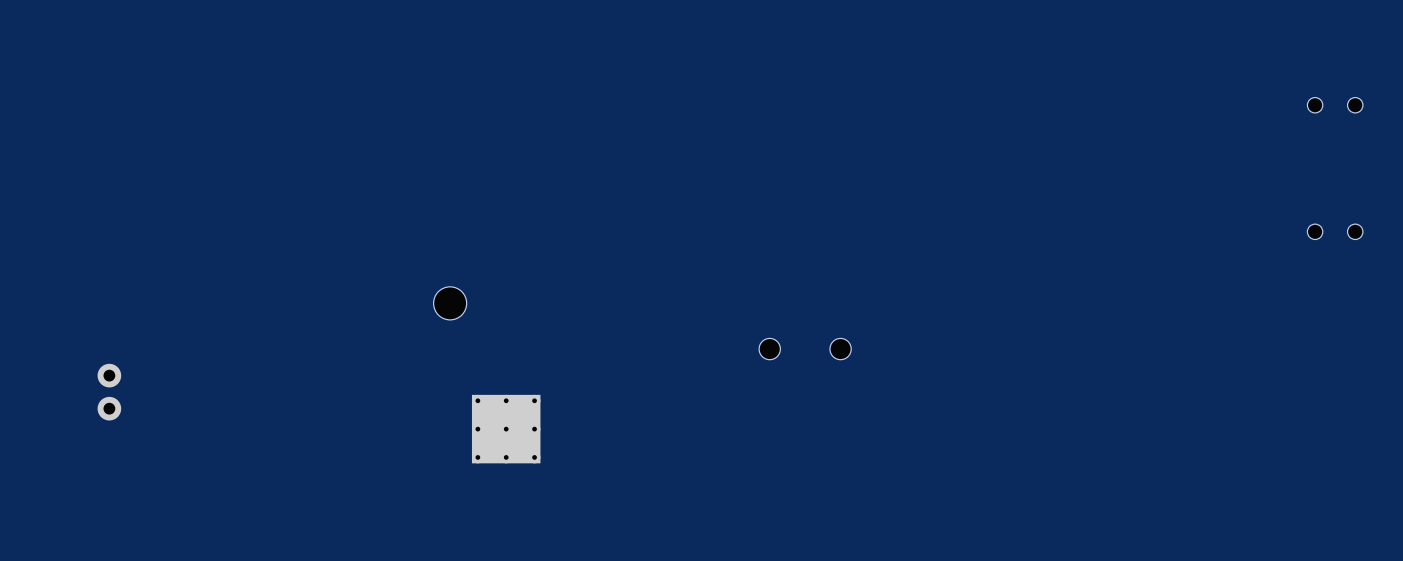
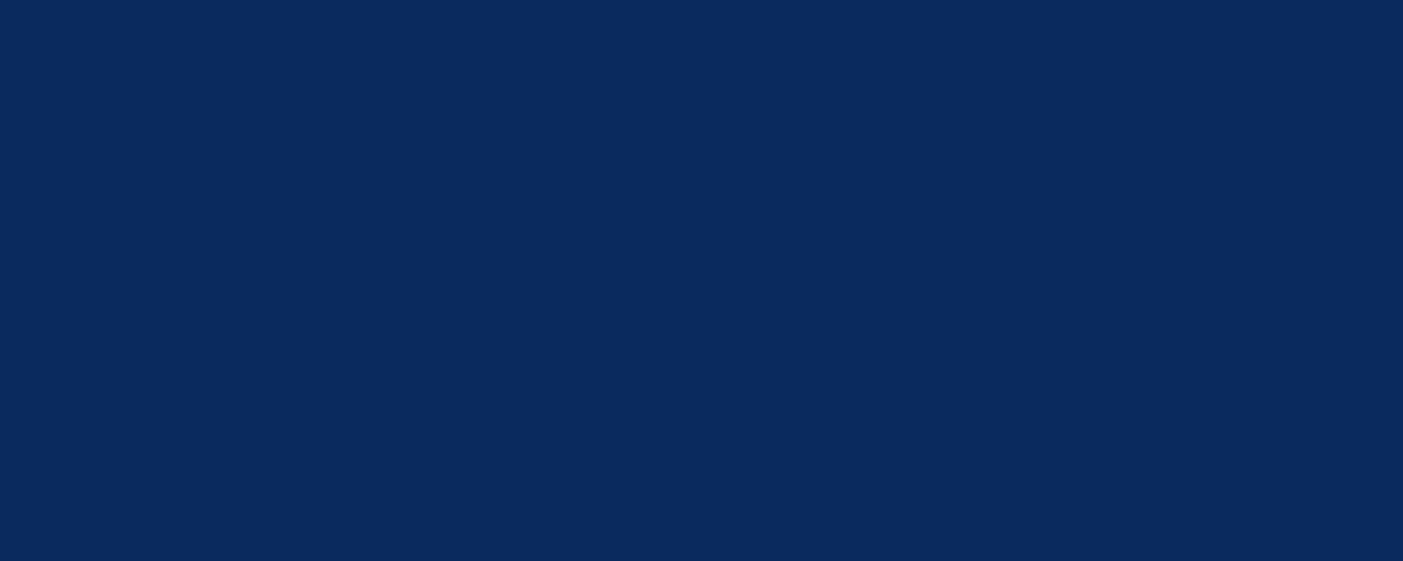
part: (1335, 105) -> none
part: (1335, 231) -> none
part: (450, 303) -> none
part: (805, 349) -> none
part: (109, 392) -> none
part: (506, 429) -> none

